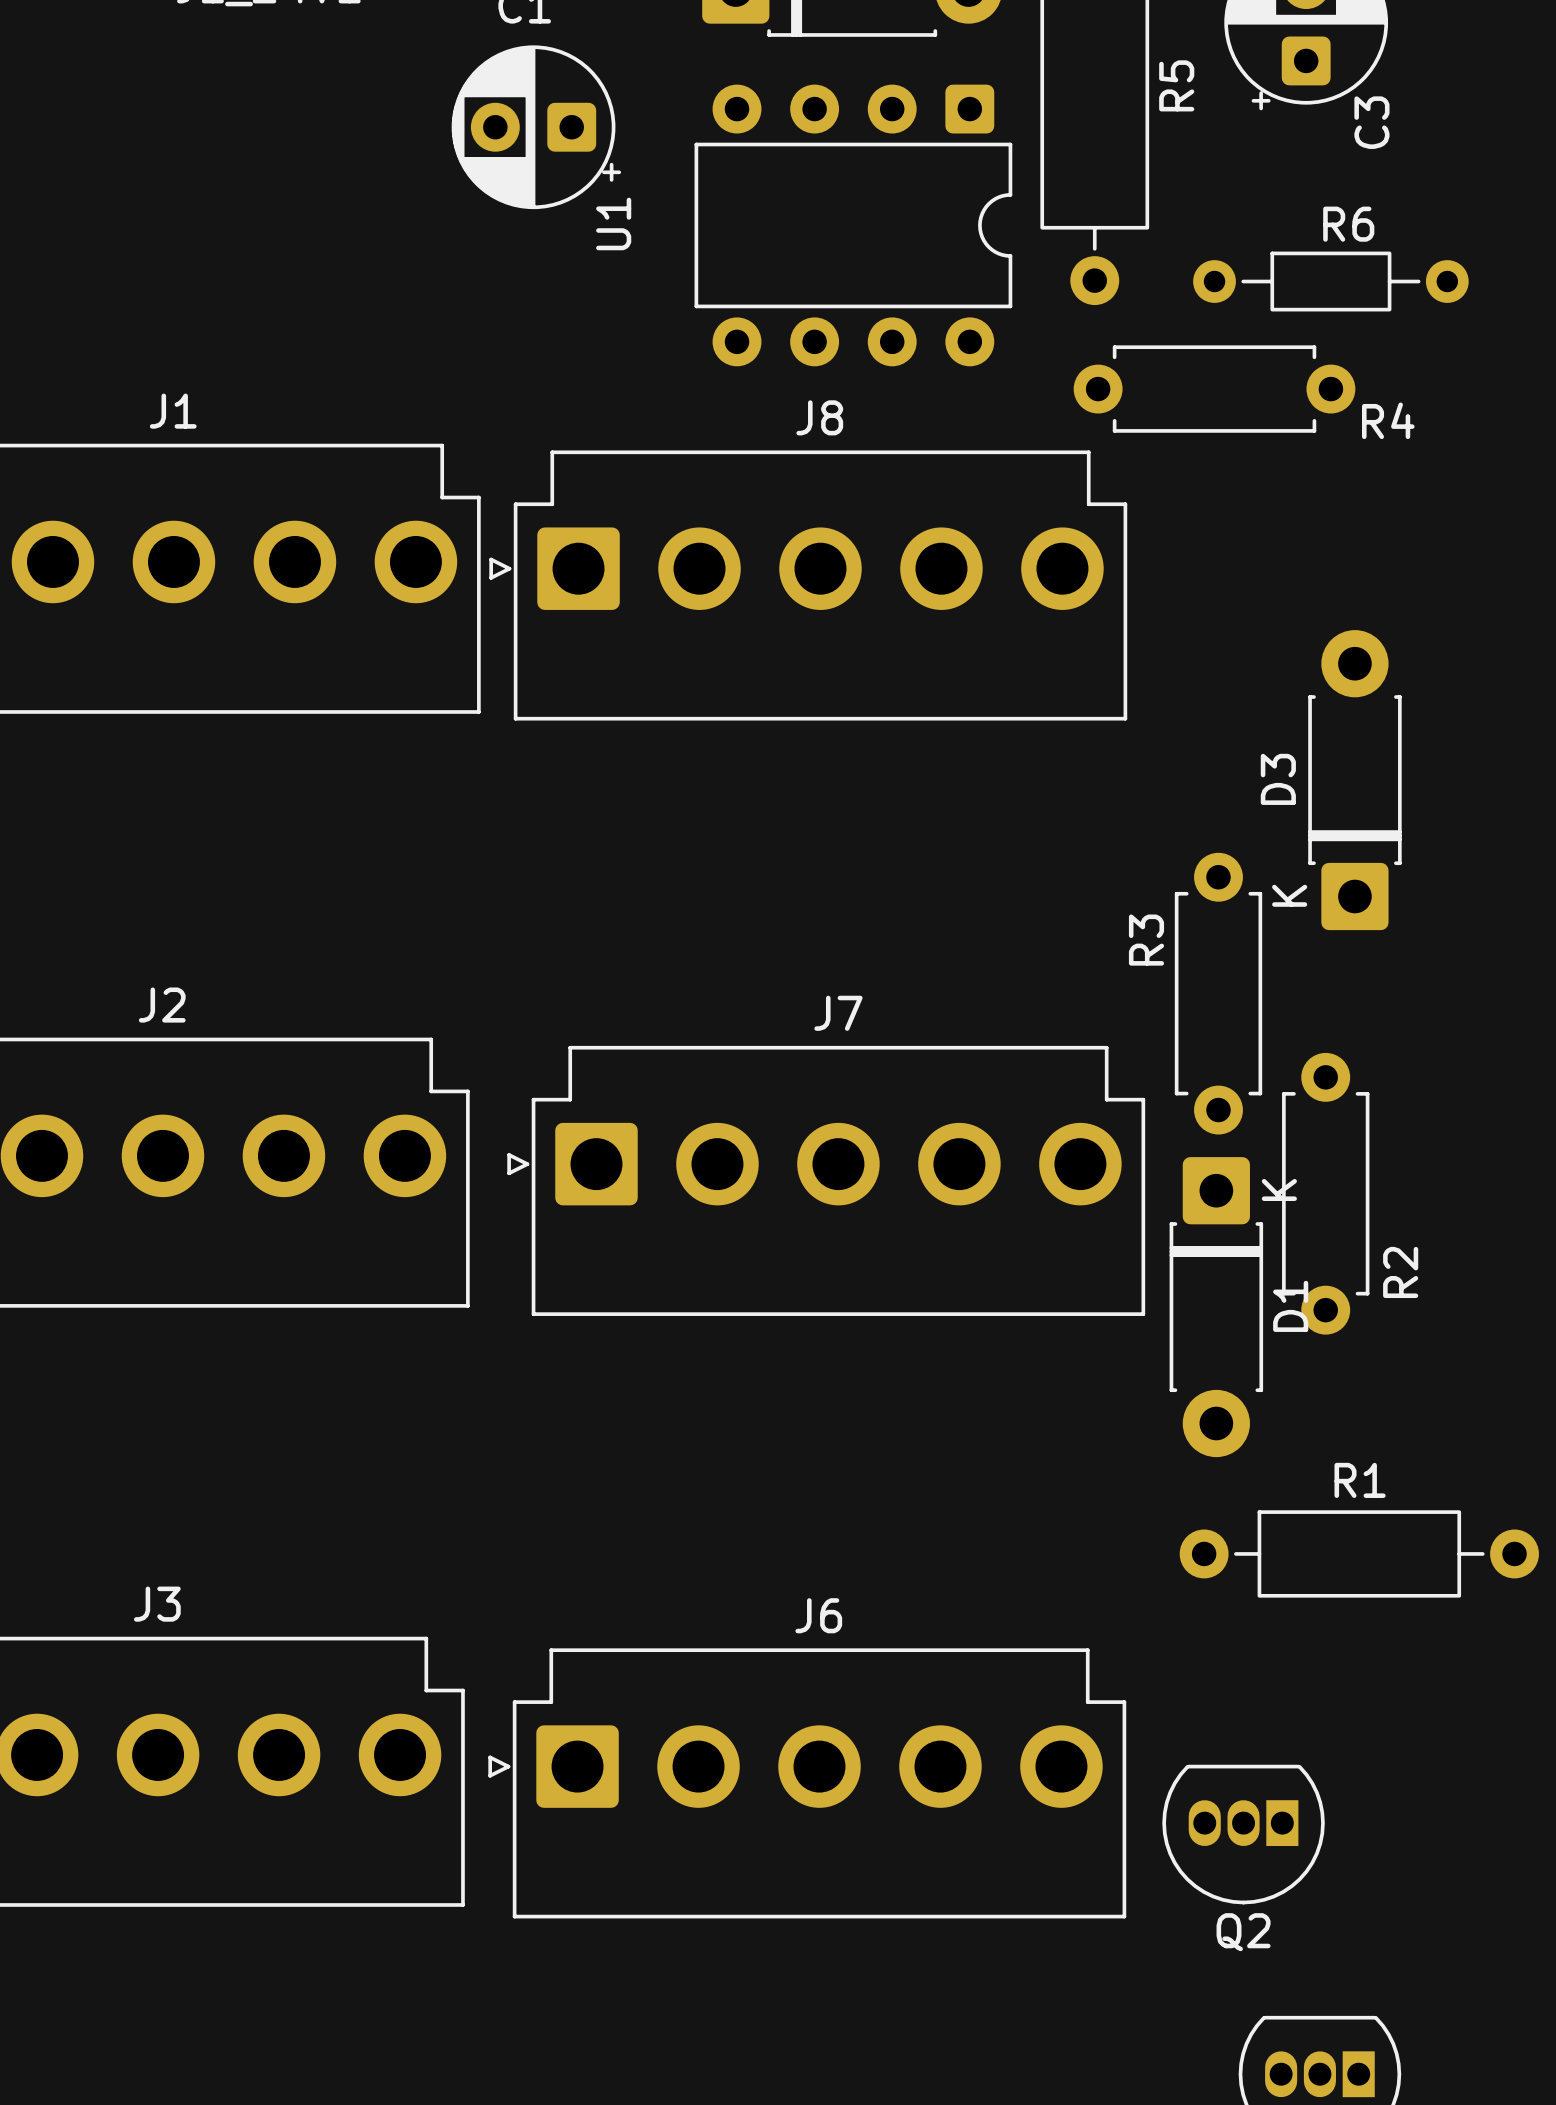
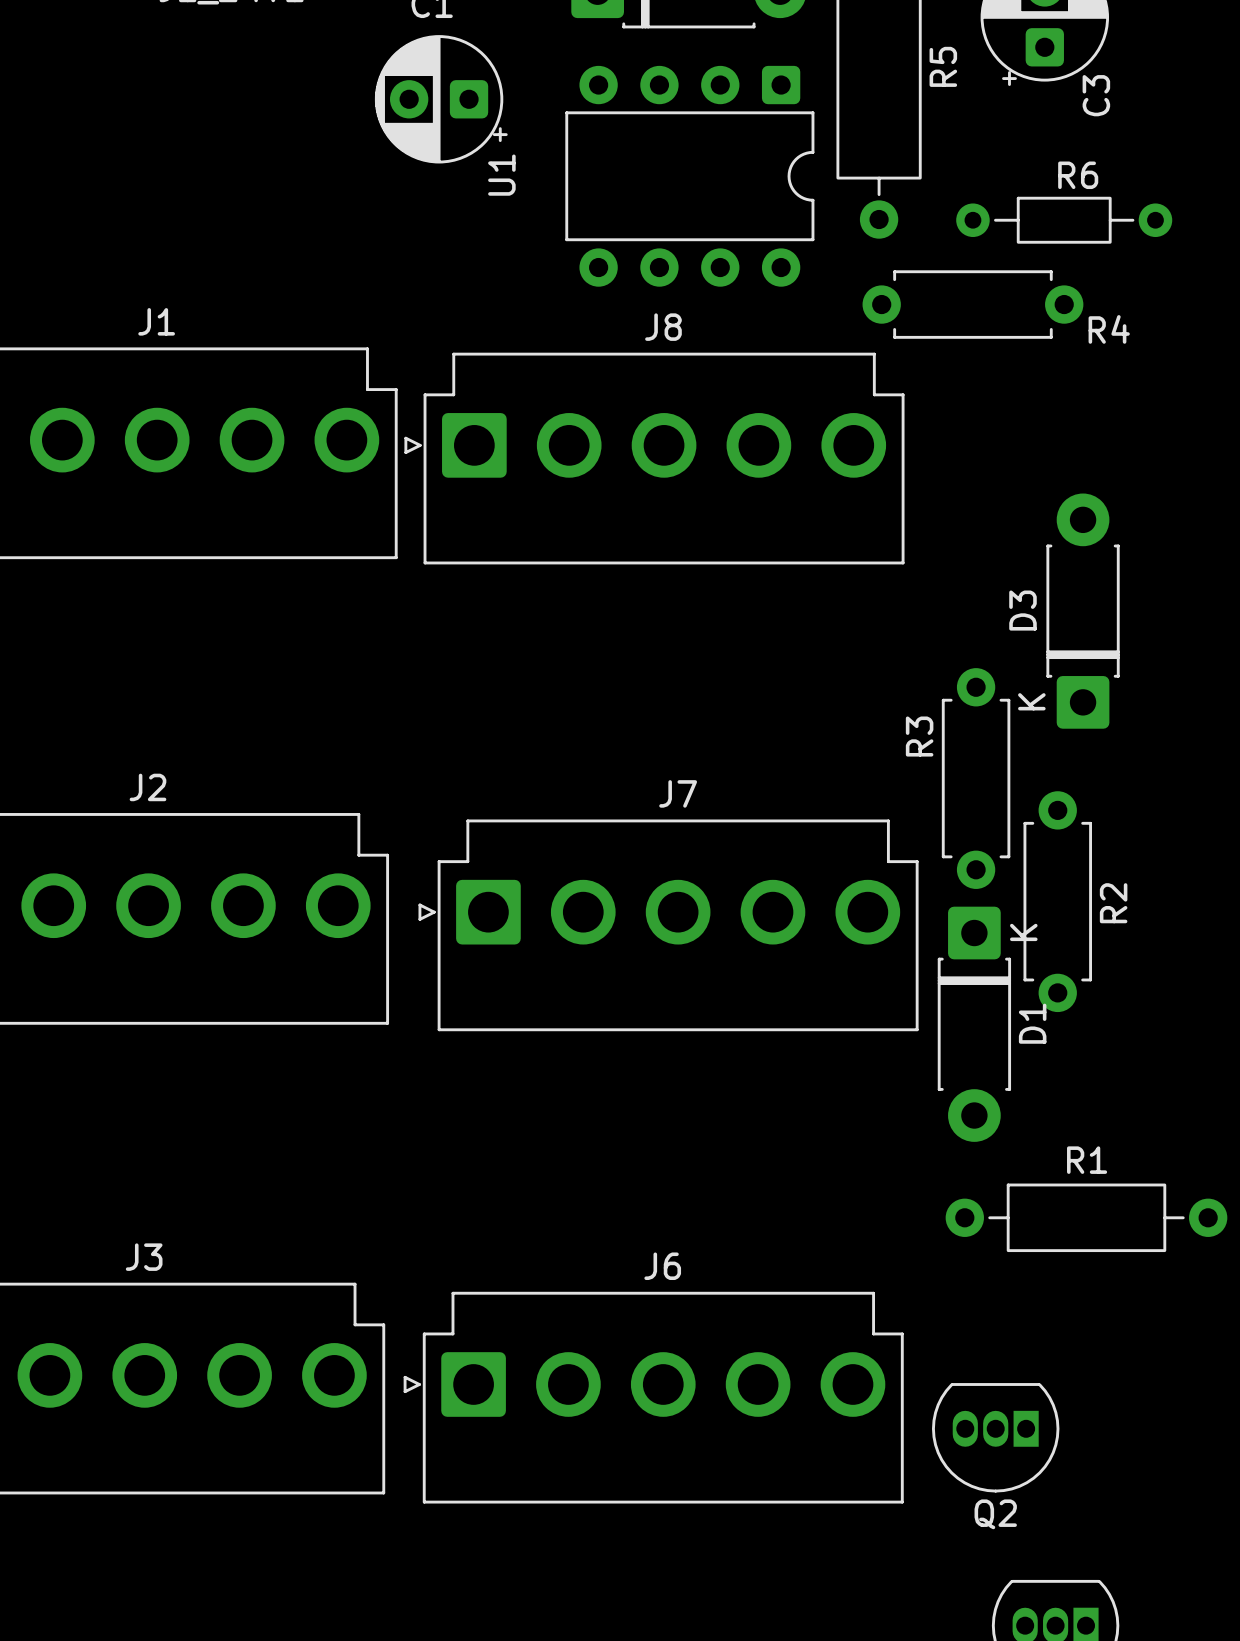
R2 position: (1325, 1193) -> (1057, 901)
R2 name position: R2 (1400, 1272) -> R2 (1113, 903)

